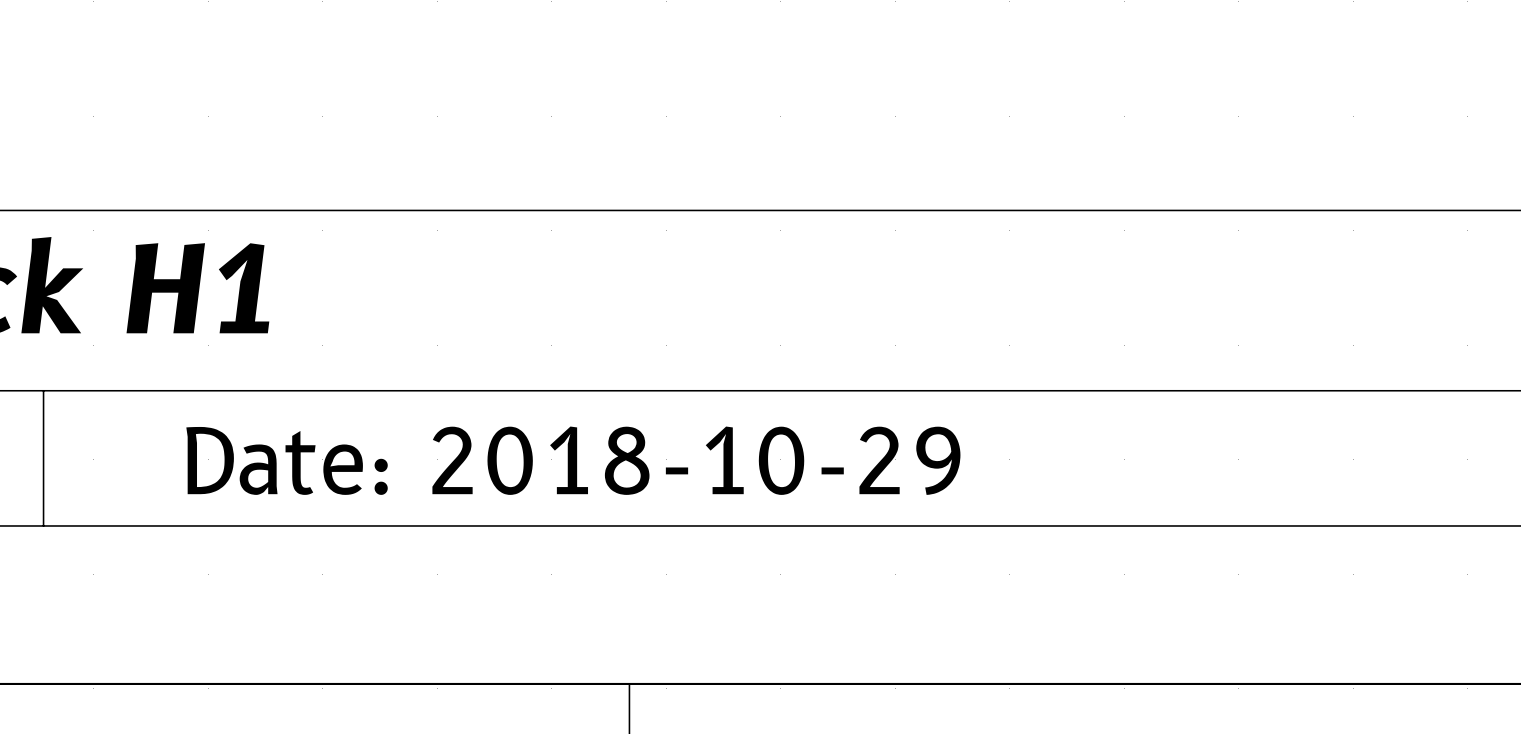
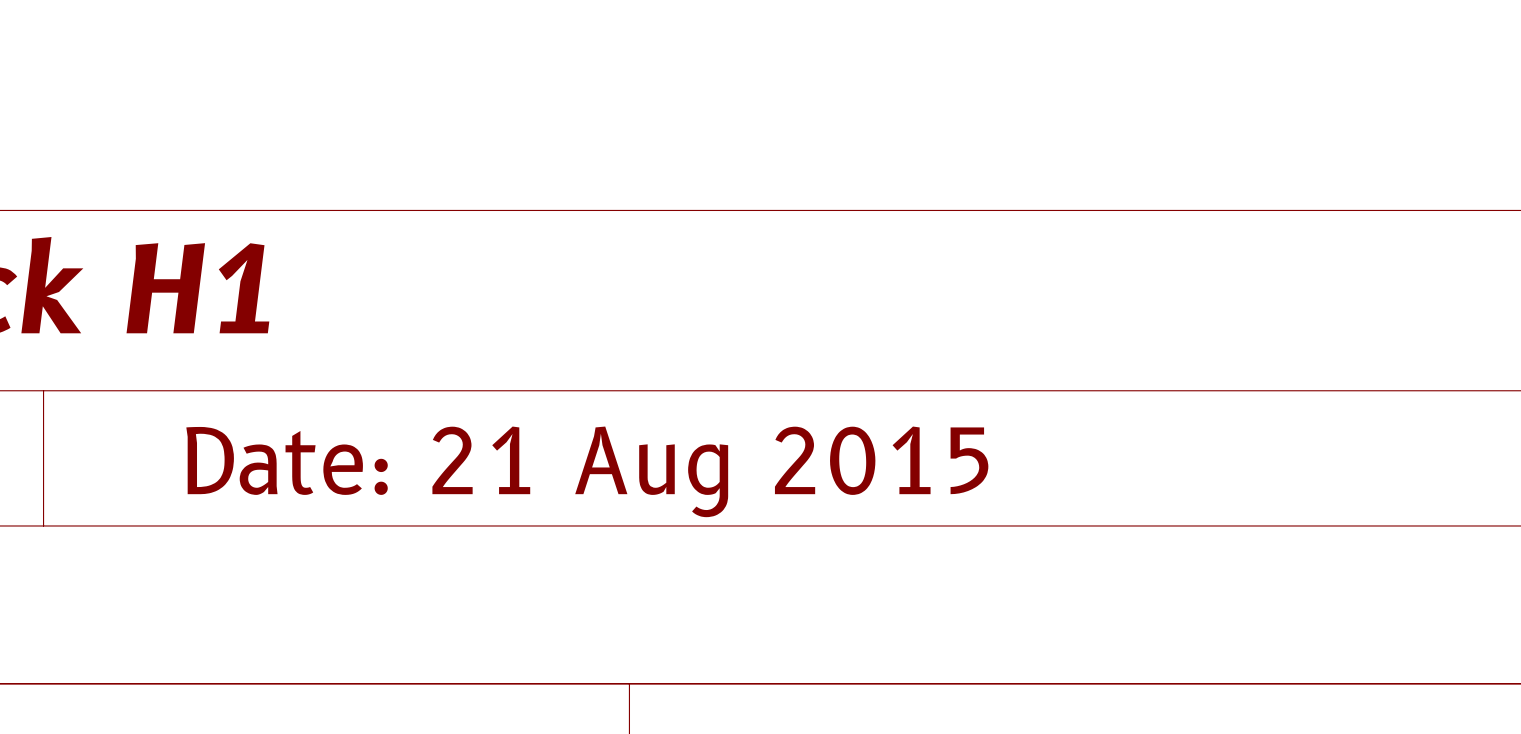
title block: Date: 2018-10-29 (573, 460) -> Date: 21 Aug 2015 (587, 471)

